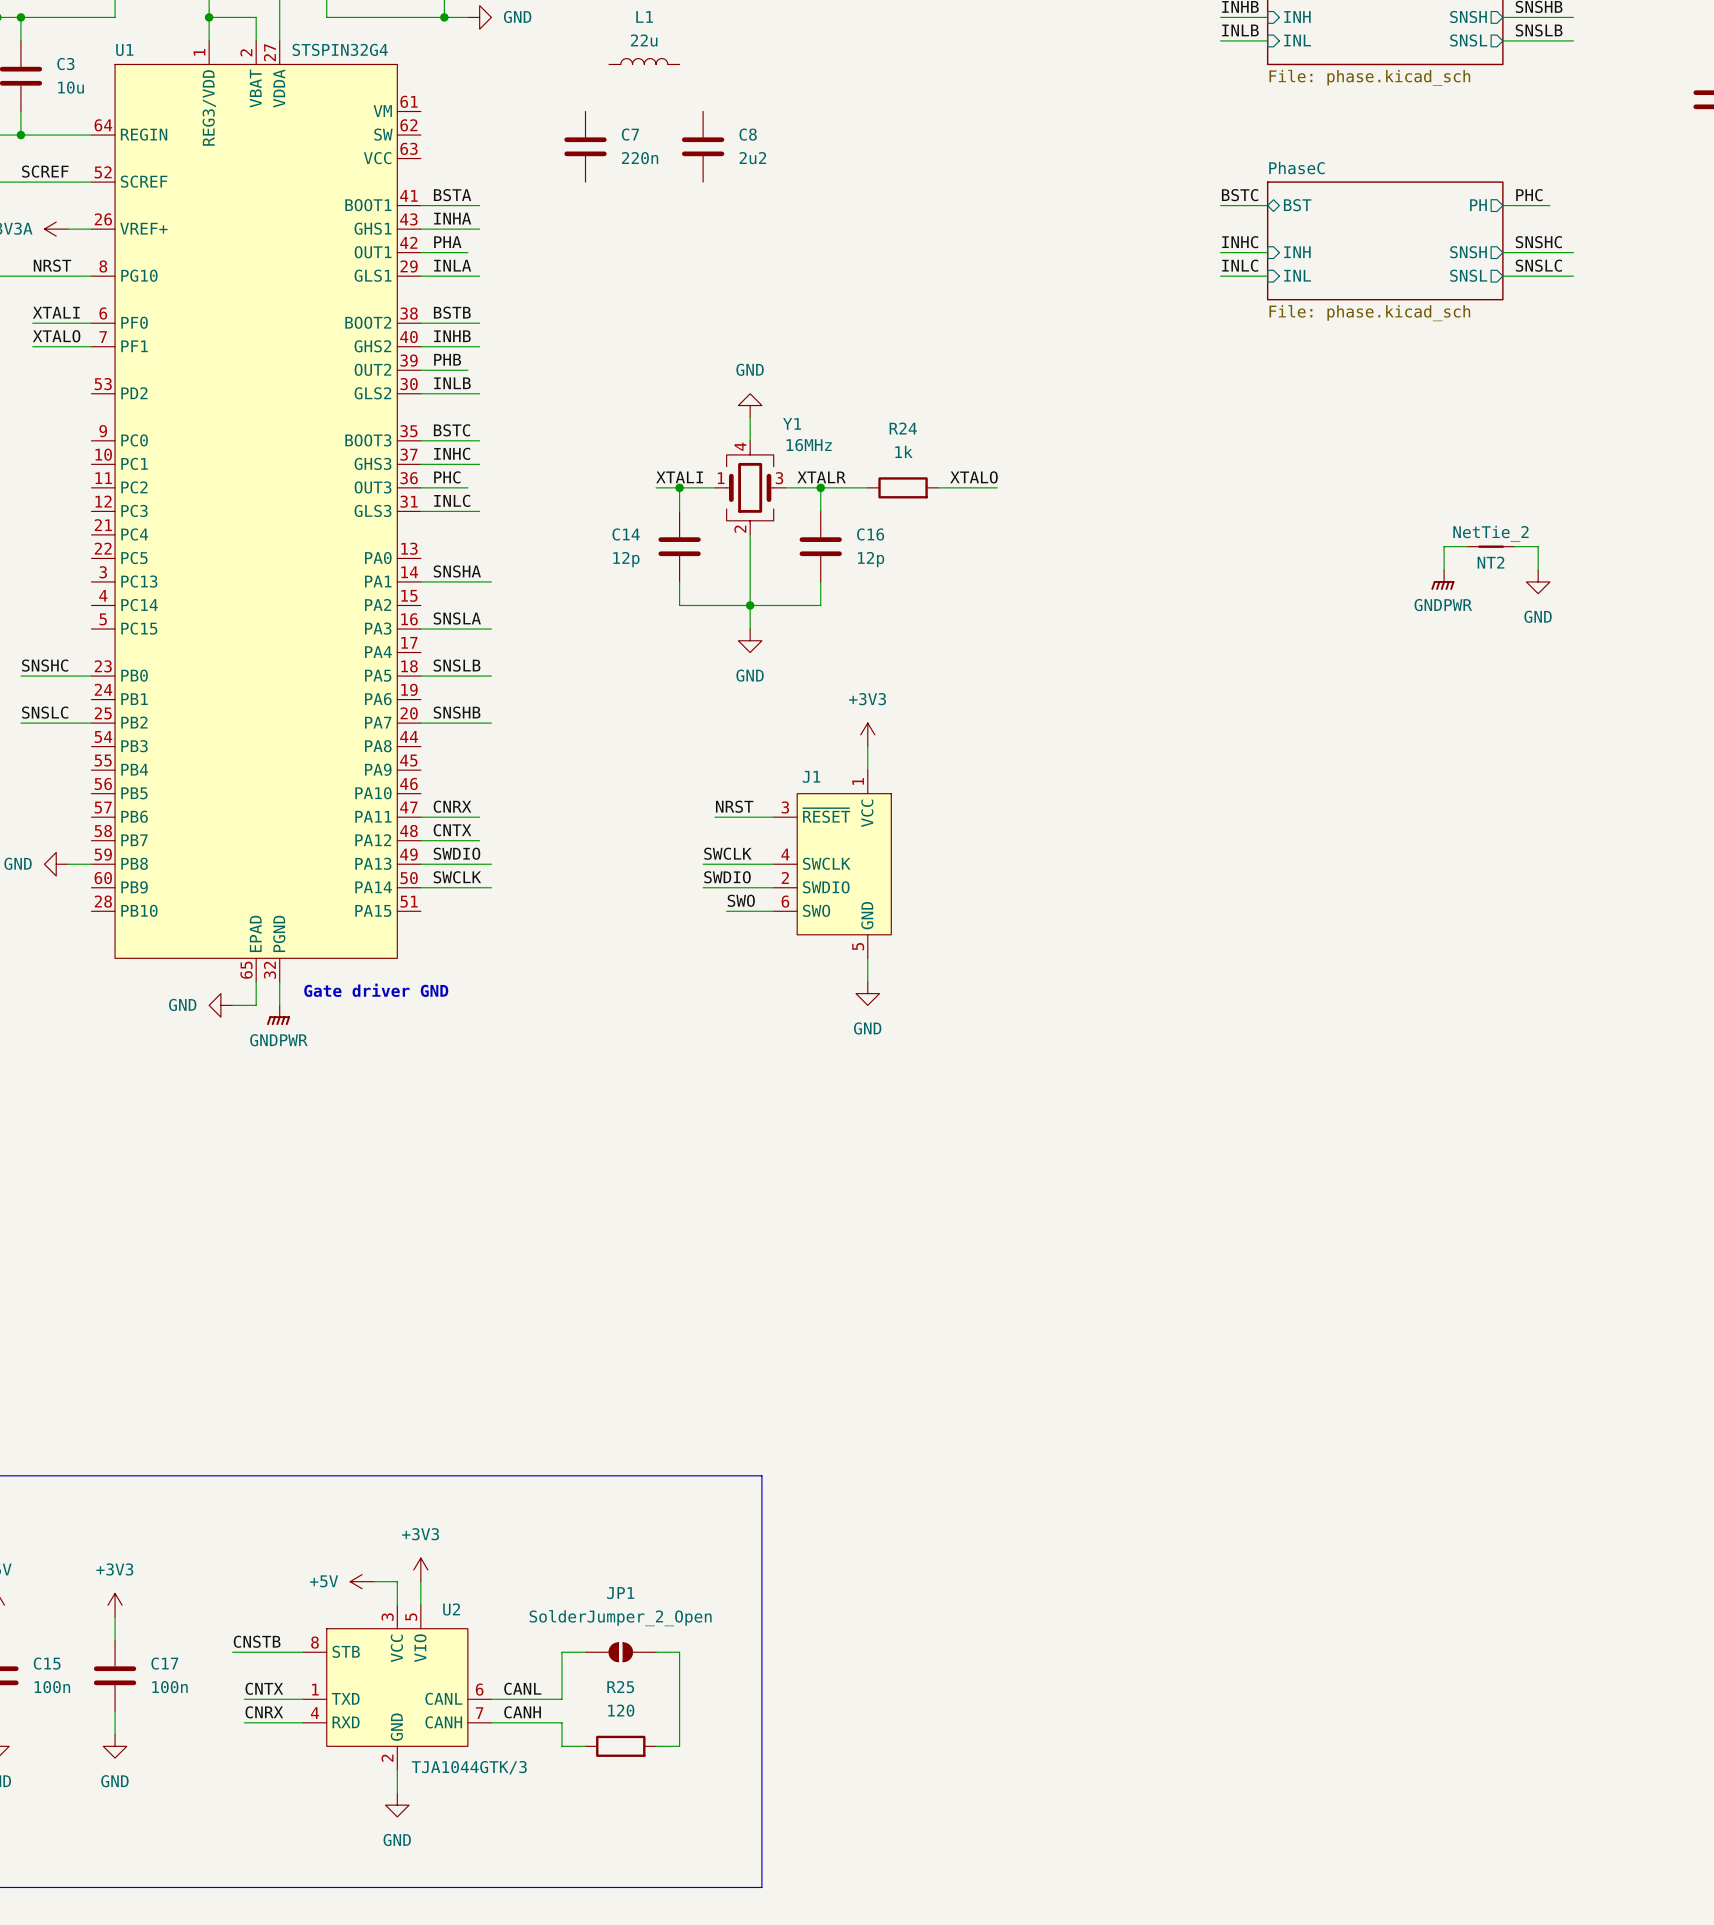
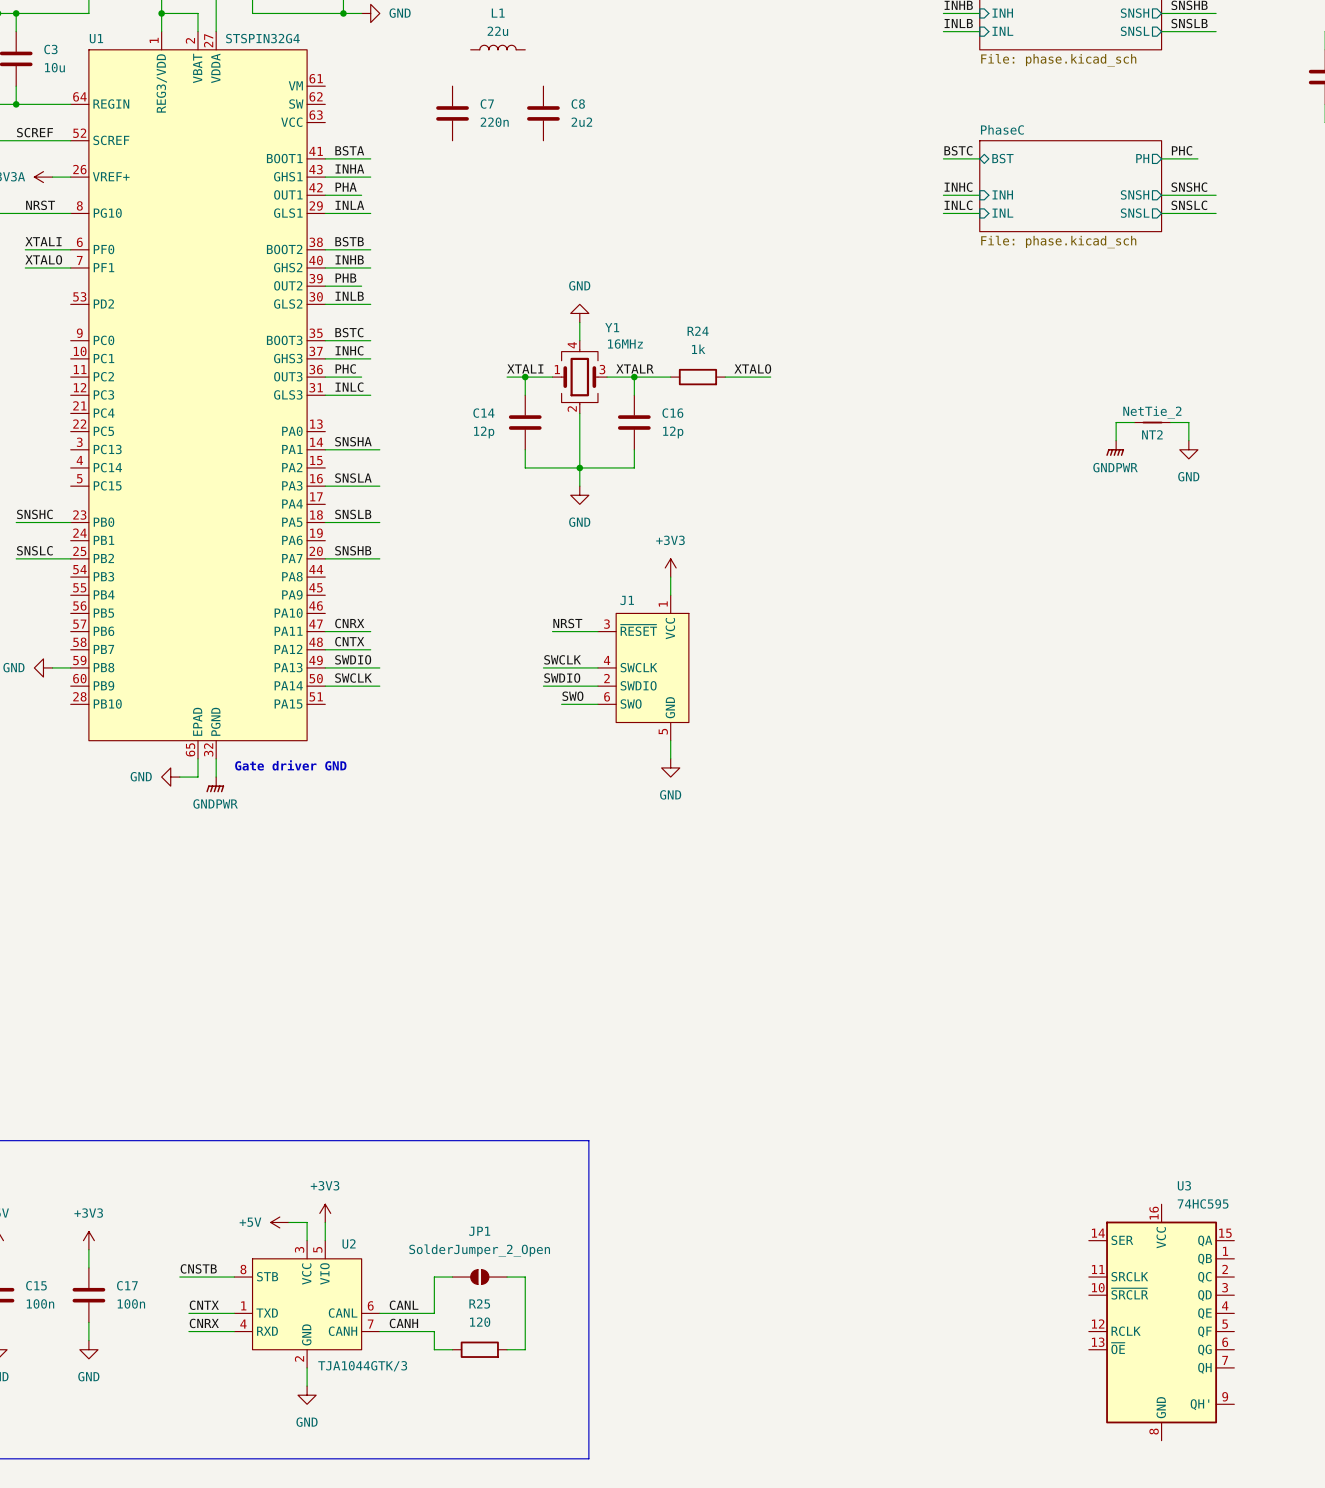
U3: none -> 74HC595 (1161, 1322)

